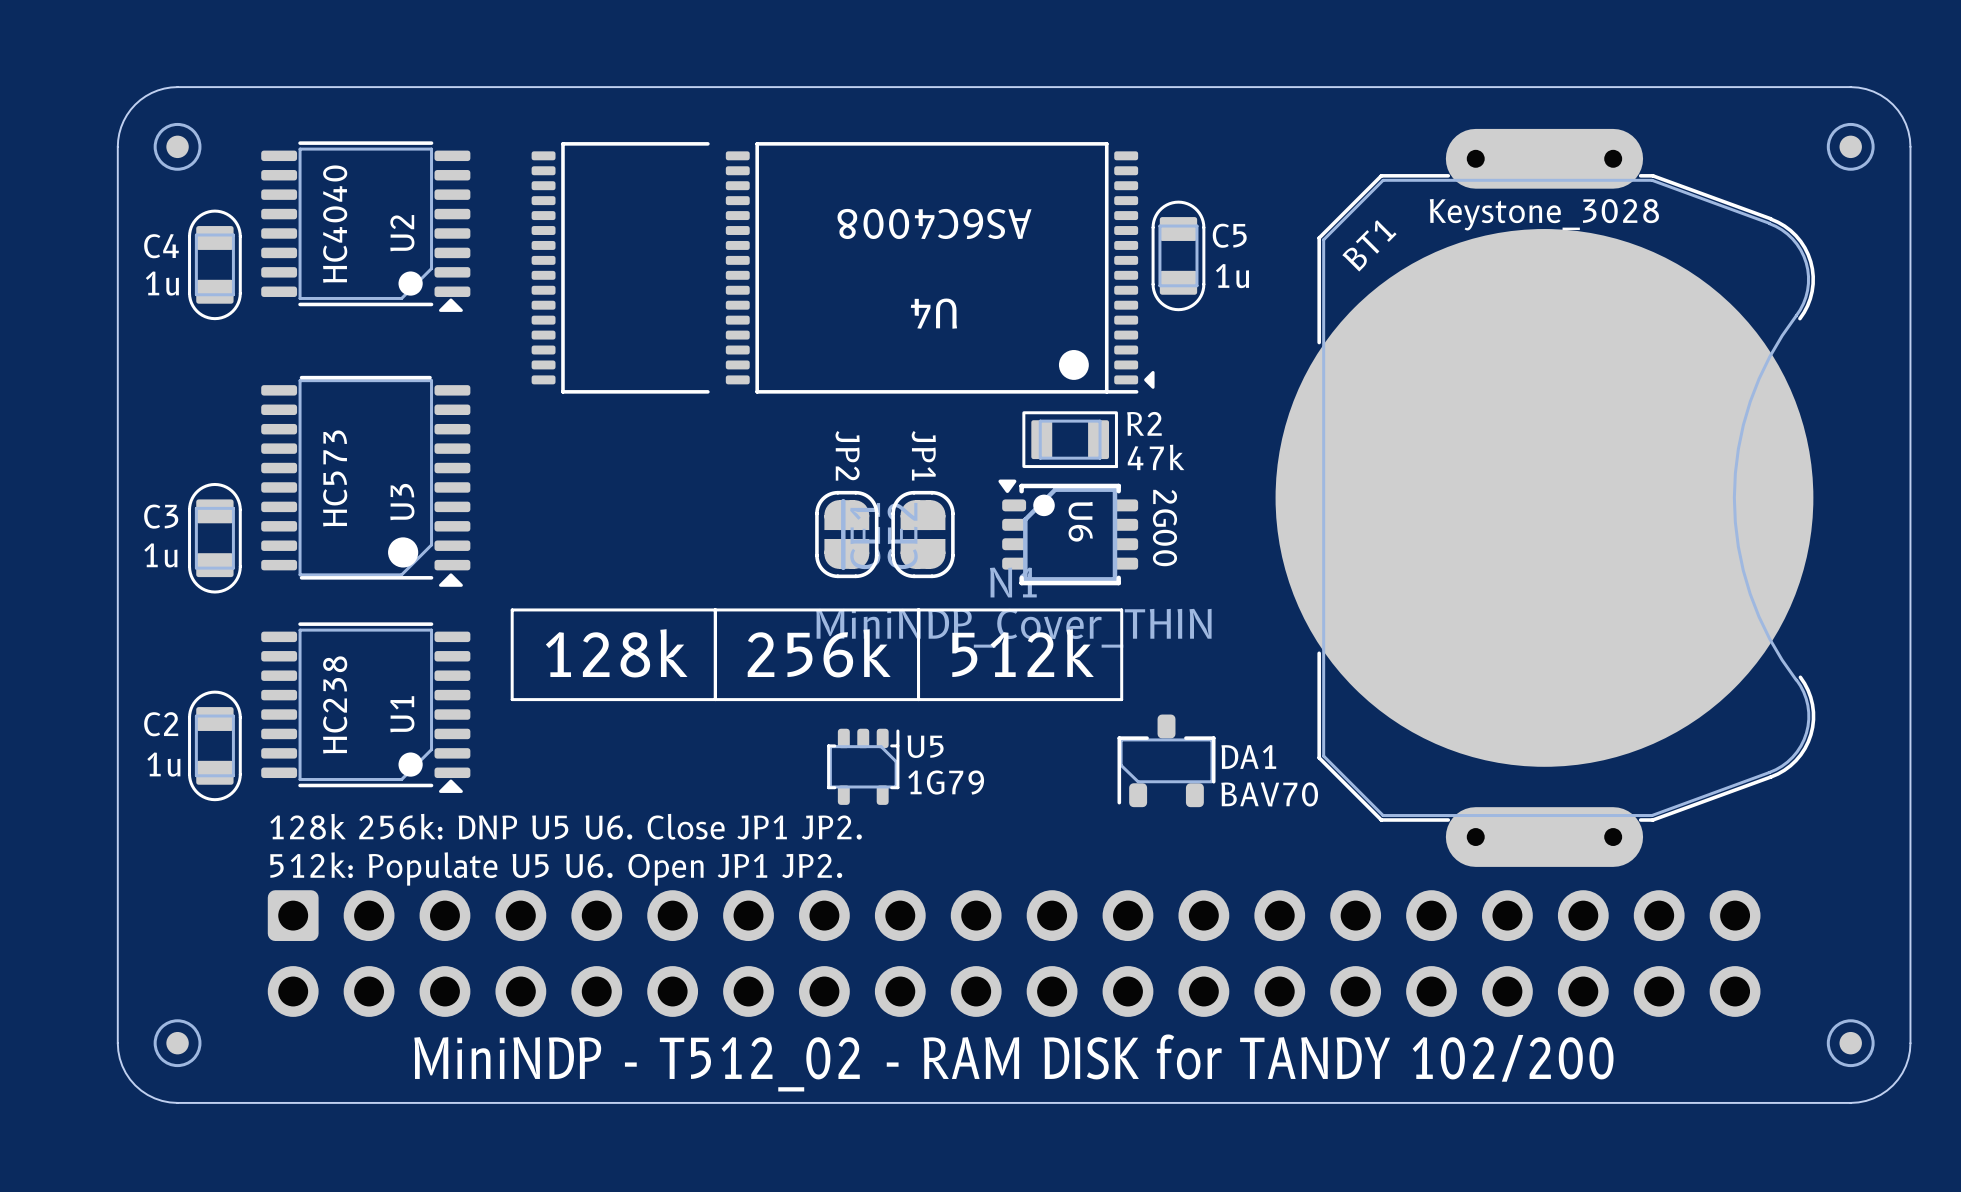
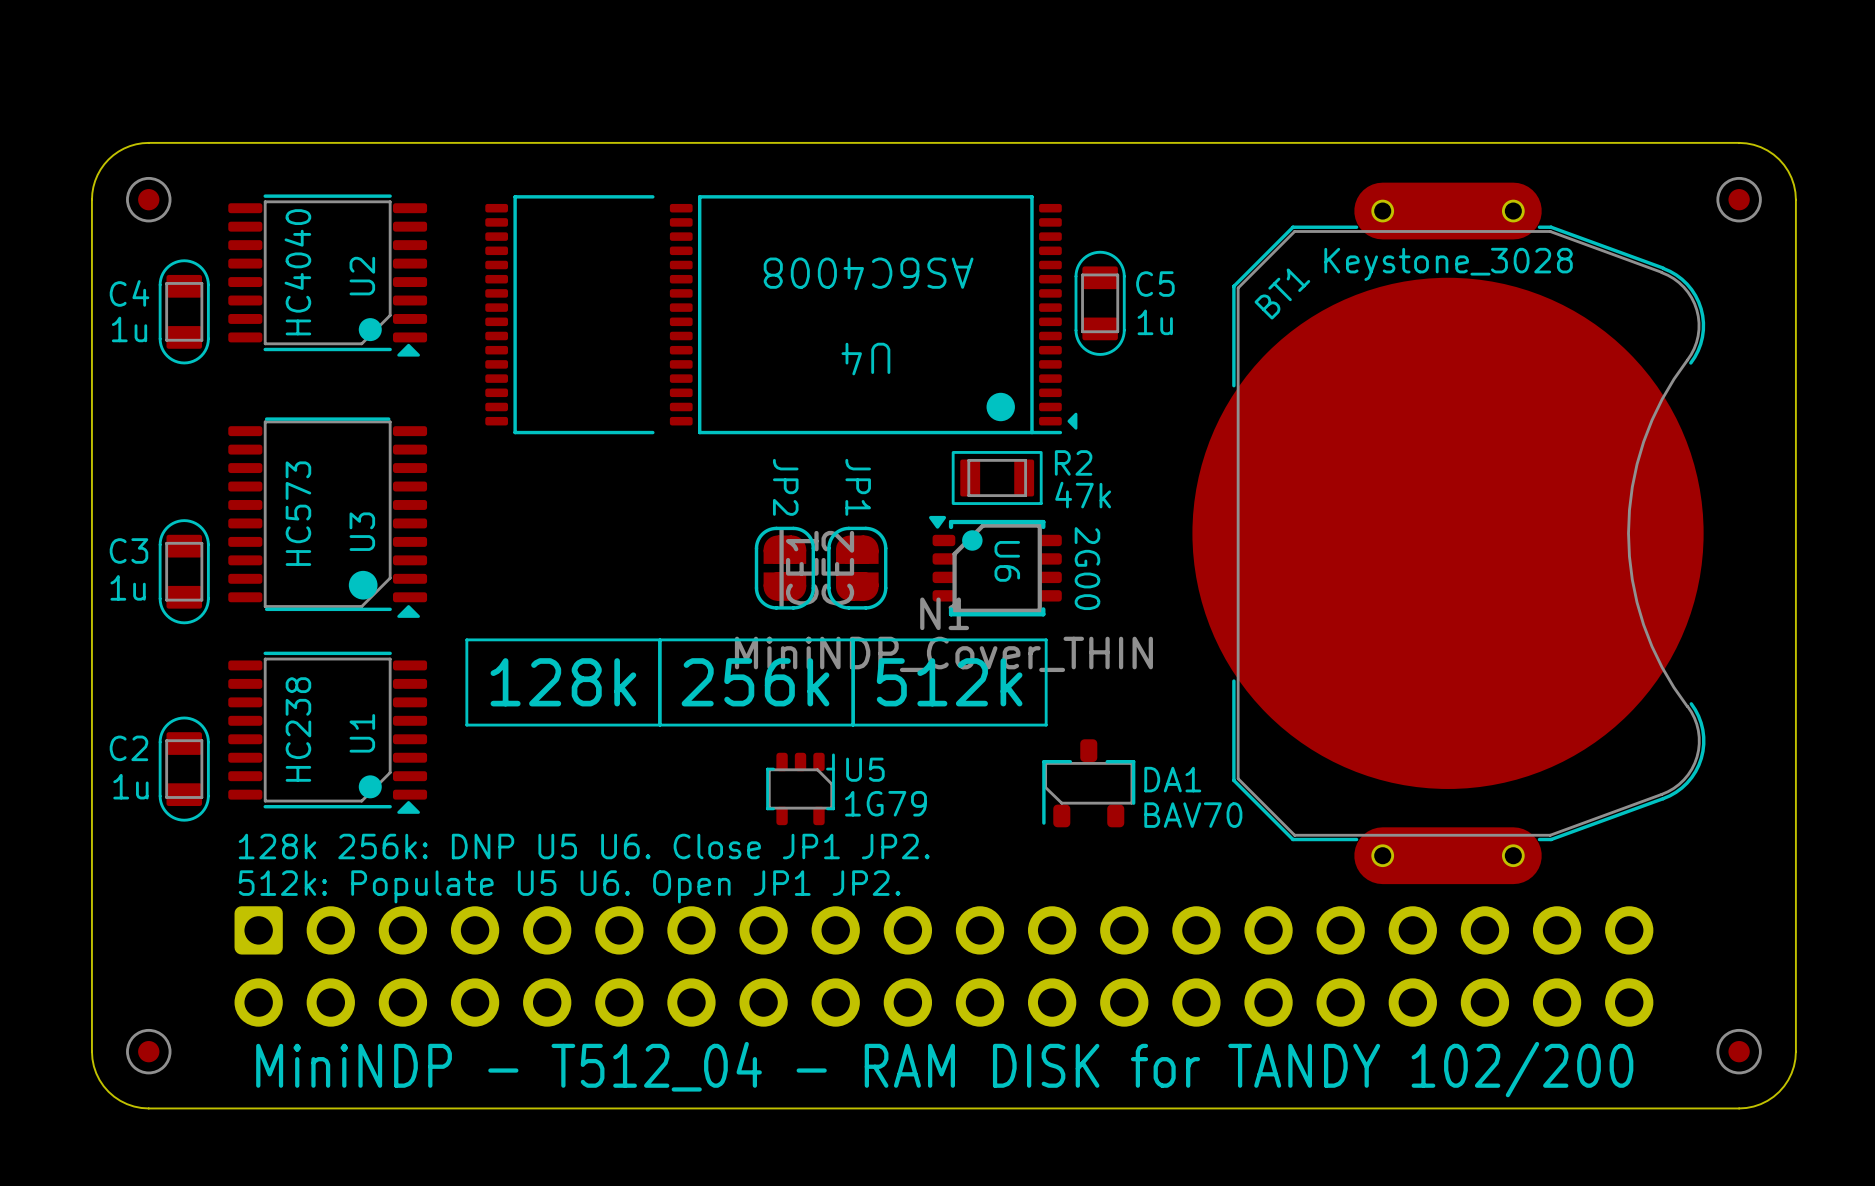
text: MiniNDP - T512_02 - RAM DISK for TANDY 102/200 (1013, 1062) -> MiniNDP - T512_04 - RAM DISK for TANDY 102/200 (944, 1069)

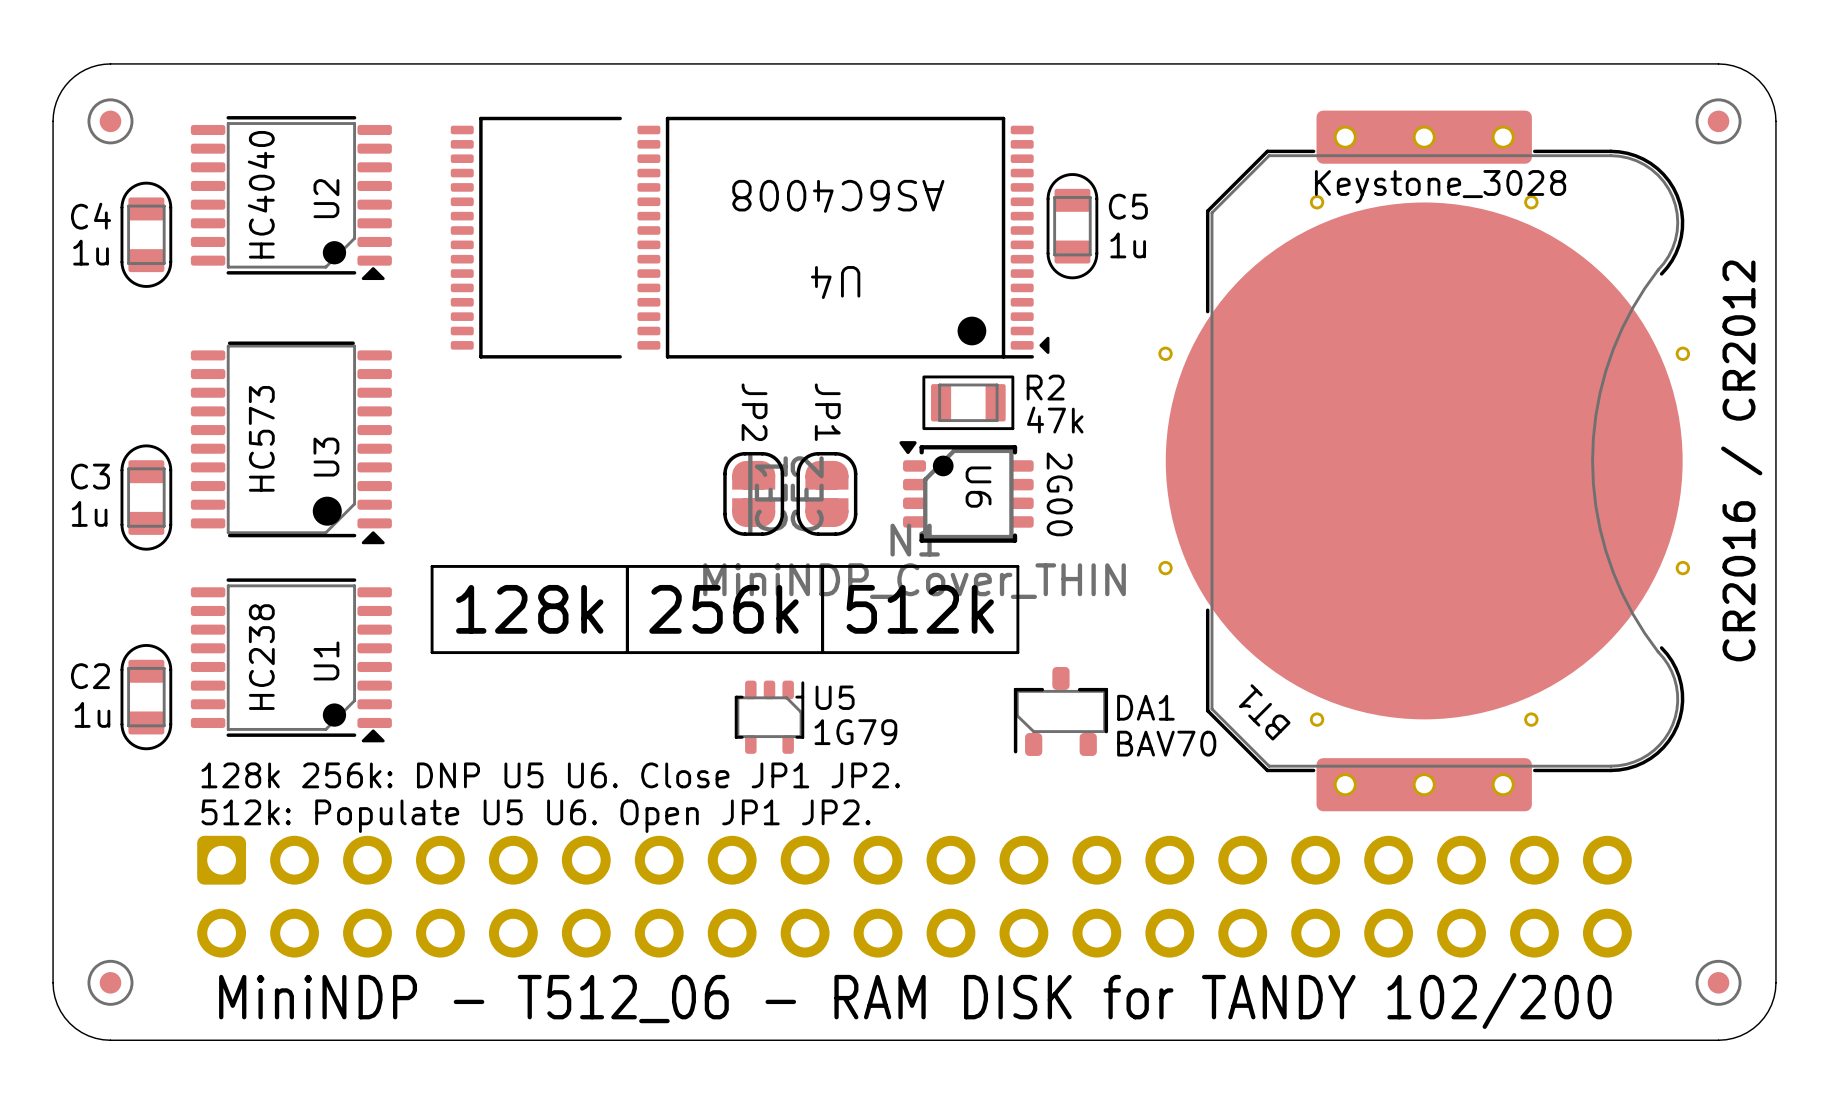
BT1 footprint: [1192, 182, 1706, 885] -> [1158, 110, 1691, 812]
part: (1382, 211) -> none
part: (1513, 211) -> none
BT1 name position: BT1 (1282, 294) -> BT1 (1264, 712)
text: none -> CR2016 / CR2012 (1741, 460)
part: (1382, 855) -> none
part: (1513, 855) -> none
text: MiniNDP - T512_04 - RAM DISK for TANDY 102/200 (944, 1069) -> MiniNDP - T512_06 - RAM DISK for TANDY 102/200 (915, 1000)

